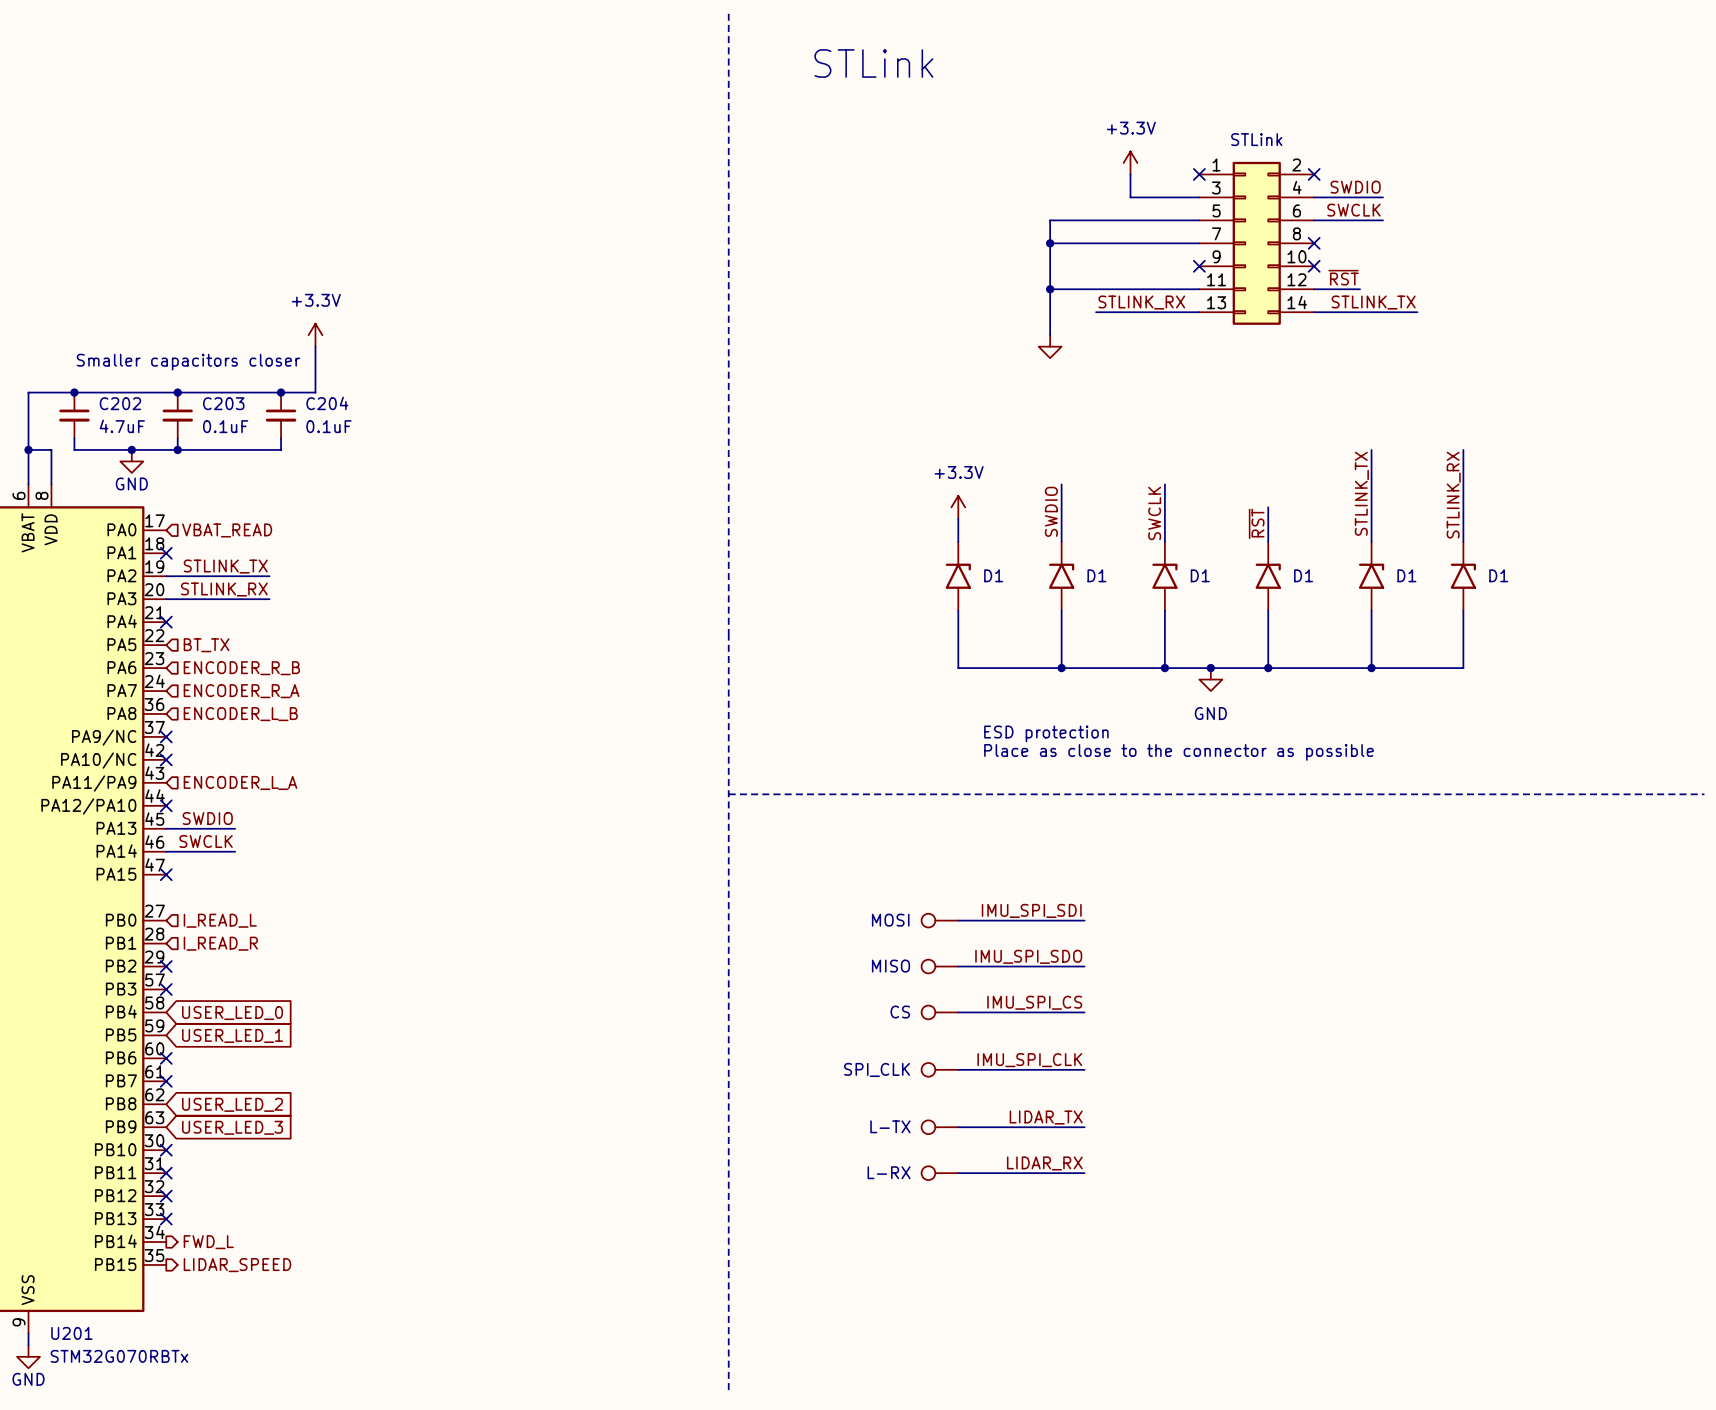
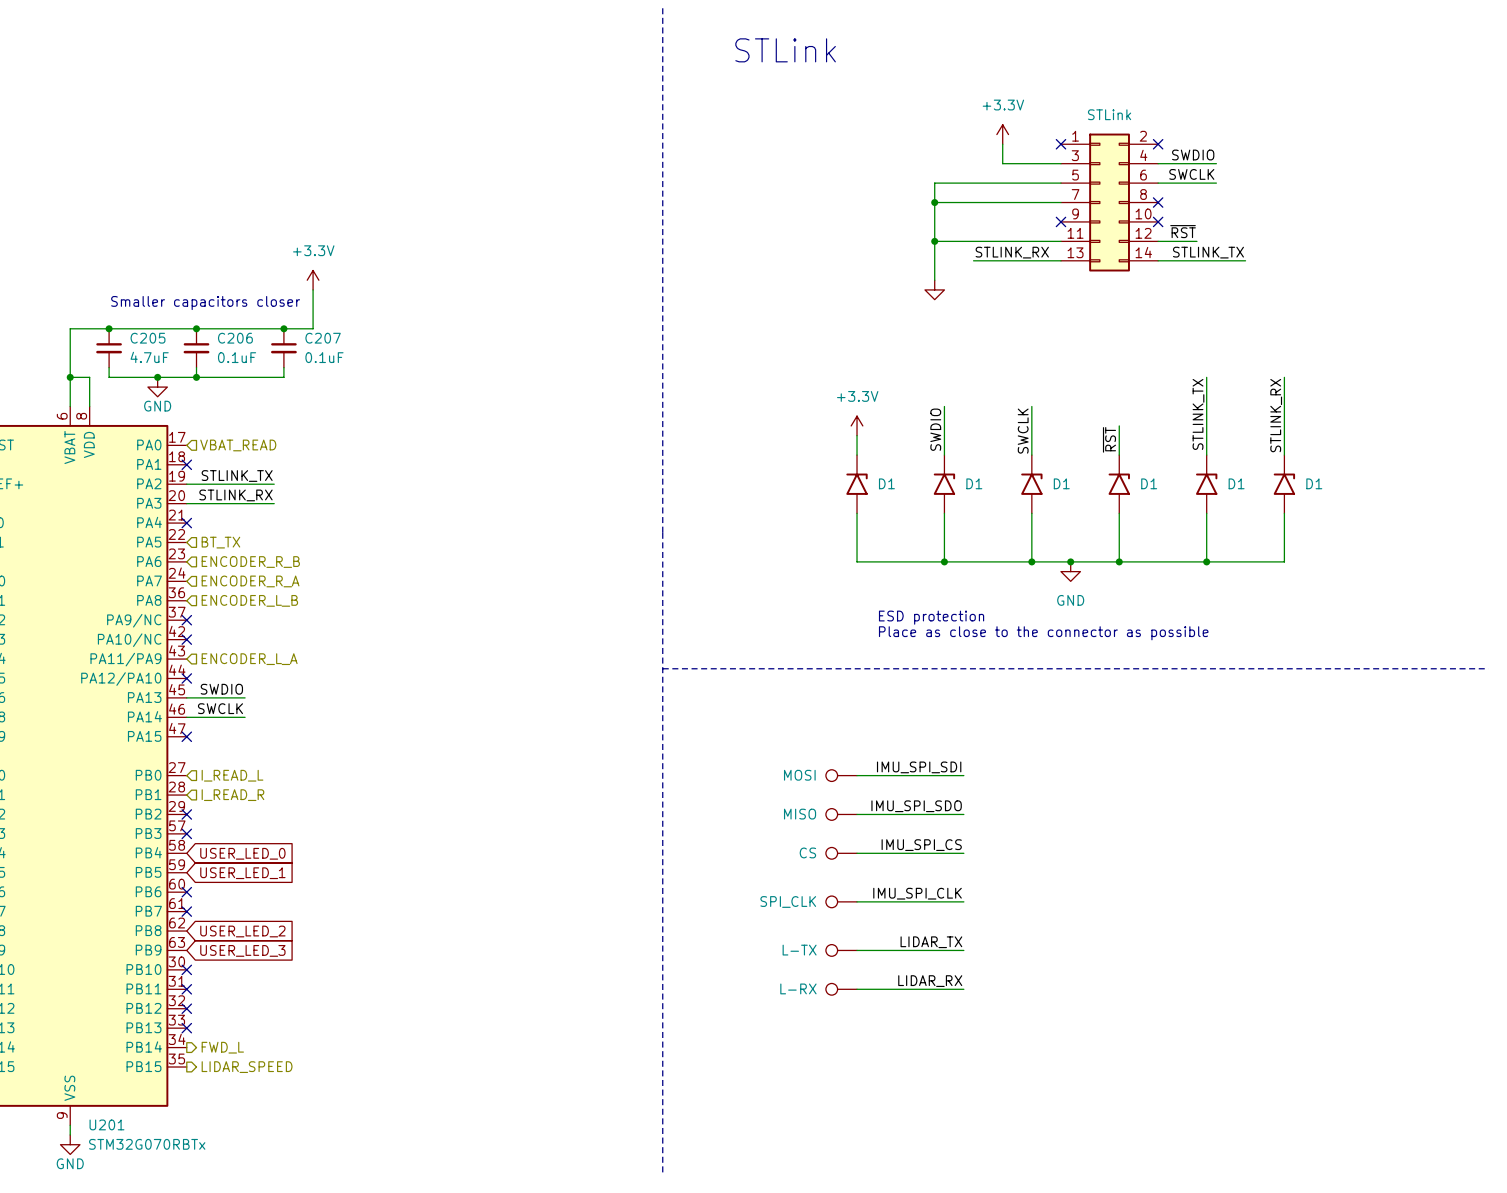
C202 name: C202 (120, 403) -> C205 (148, 338)
C203 name: C203 (223, 403) -> C206 (235, 338)
C204 name: C204 (327, 403) -> C207 (323, 338)

